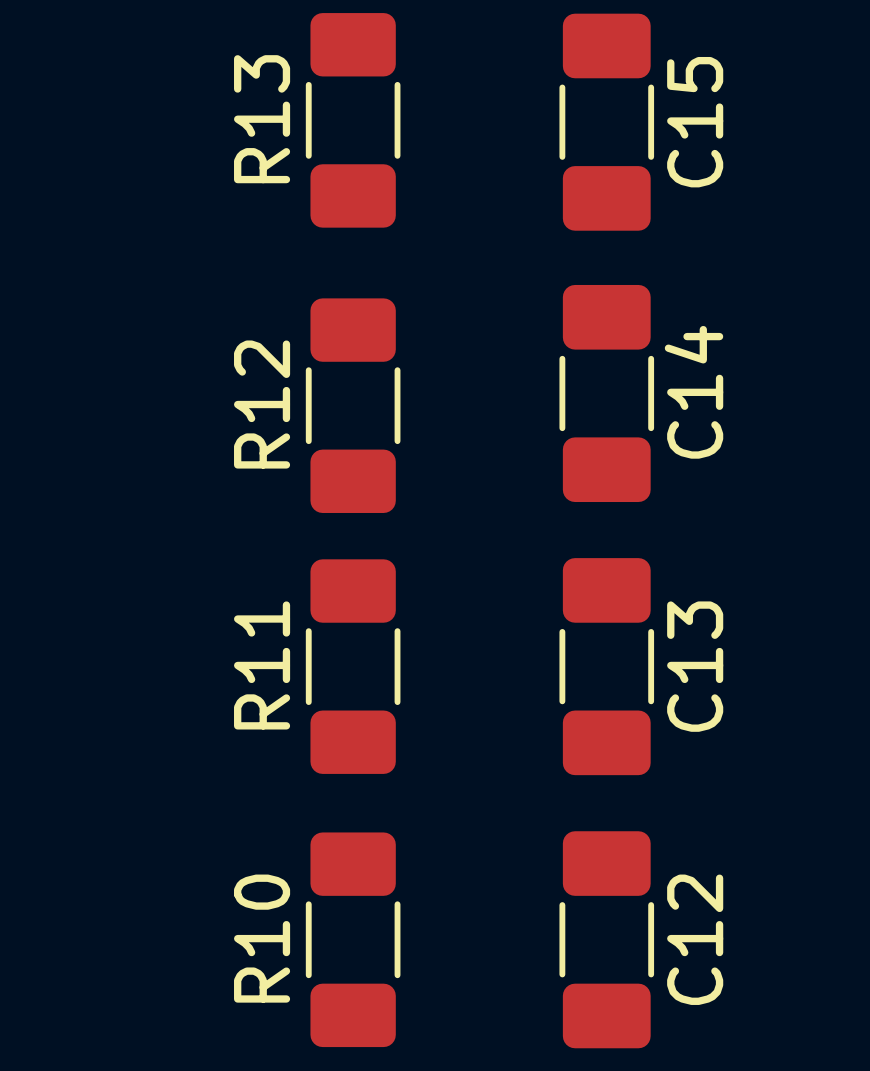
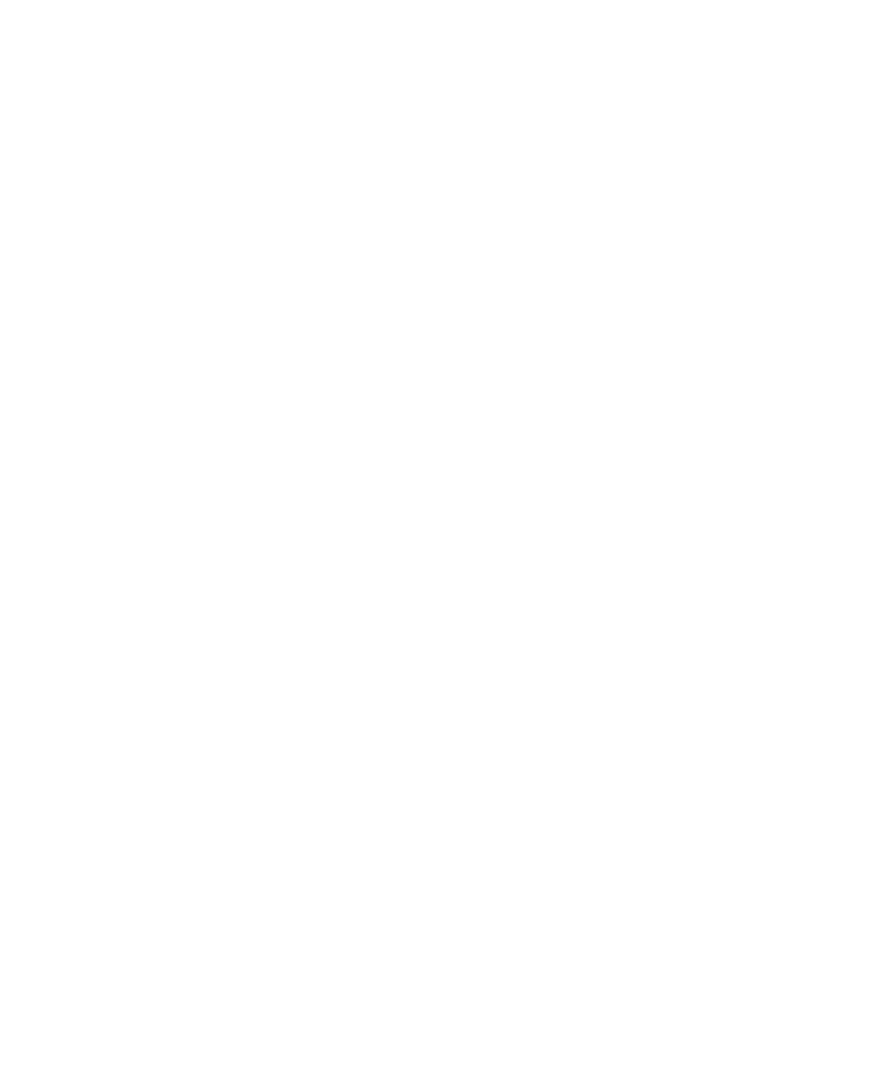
R13: (353, 120) -> none
C15: (606, 122) -> none
C14: (606, 393) -> none
R12: (353, 405) -> none
R11: (353, 666) -> none
C13: (606, 666) -> none
R10: (353, 939) -> none
C12: (606, 939) -> none

